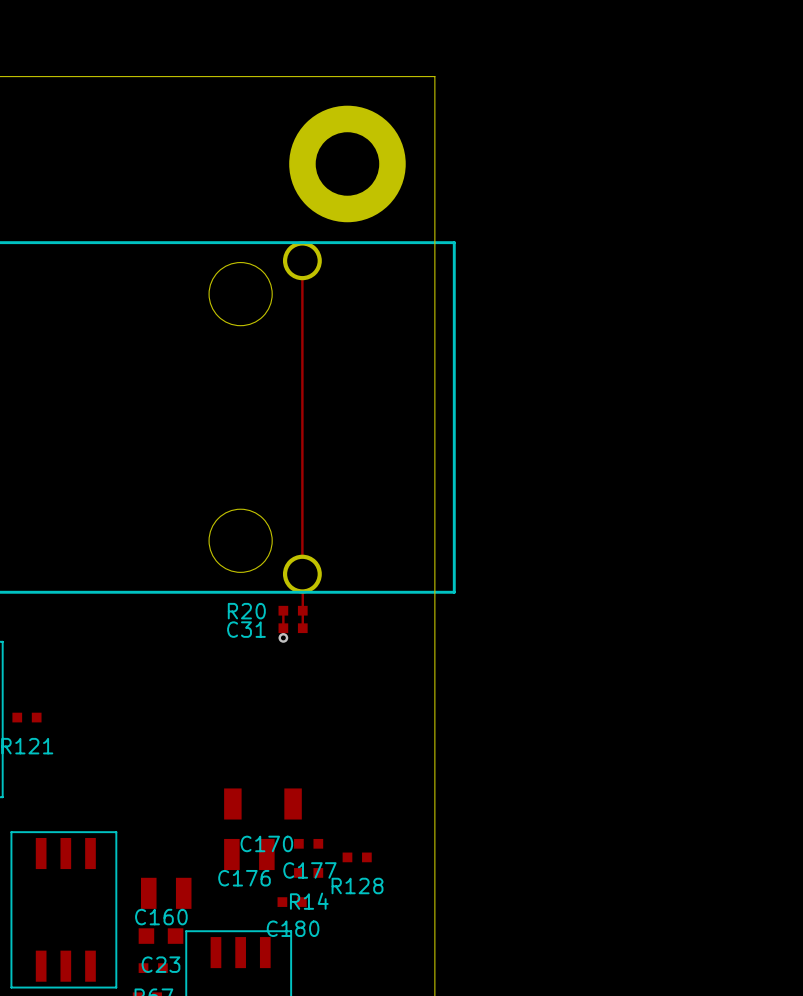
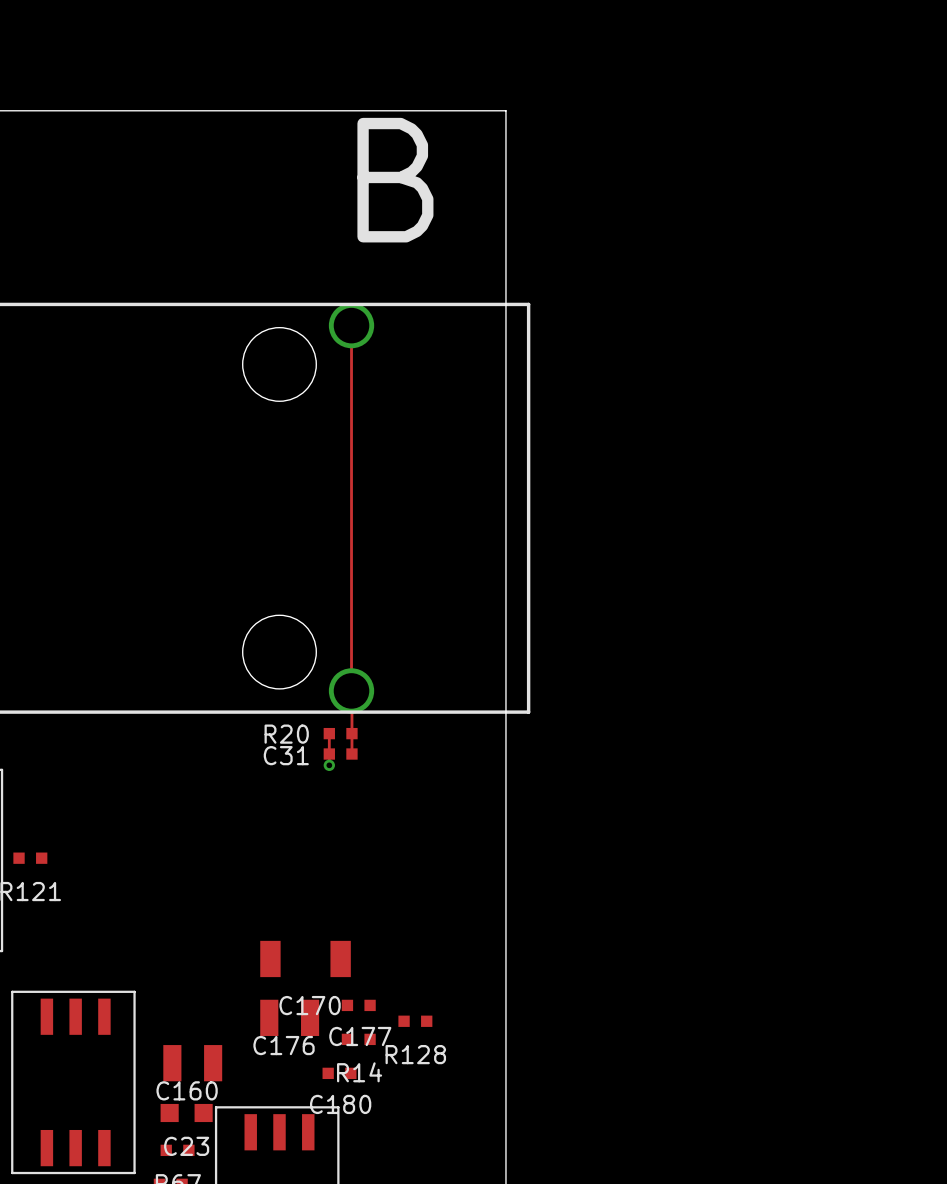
text: none -> B (395, 180)
part: (347, 163) -> none

